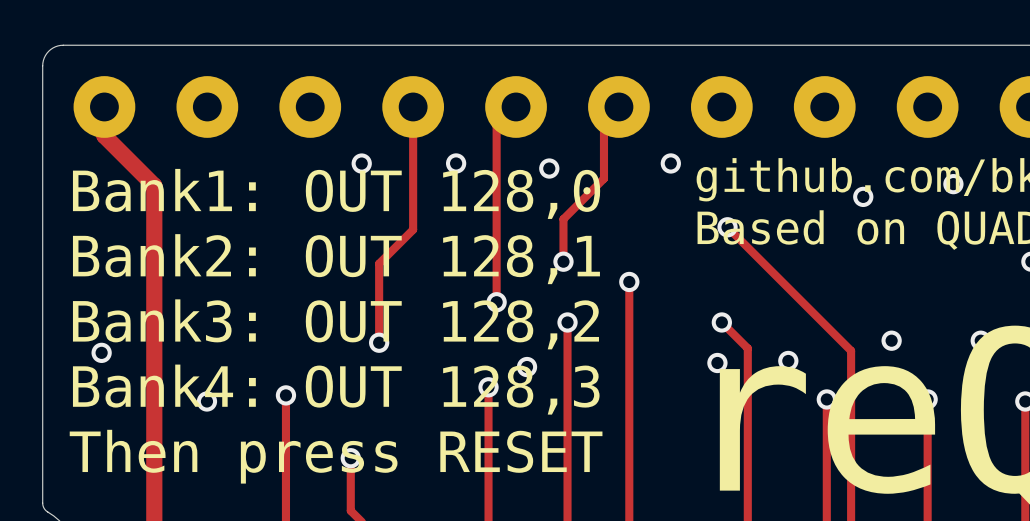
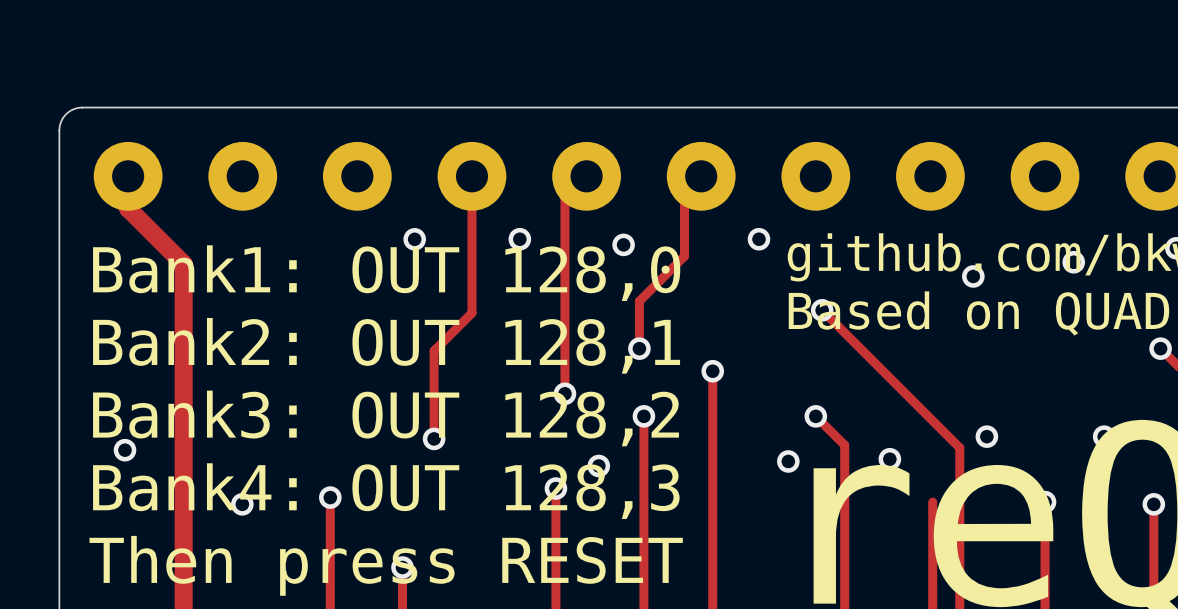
via position: (891, 340) -> (986, 436)
via position: (717, 362) -> (788, 461)
via: (826, 399) -> none

